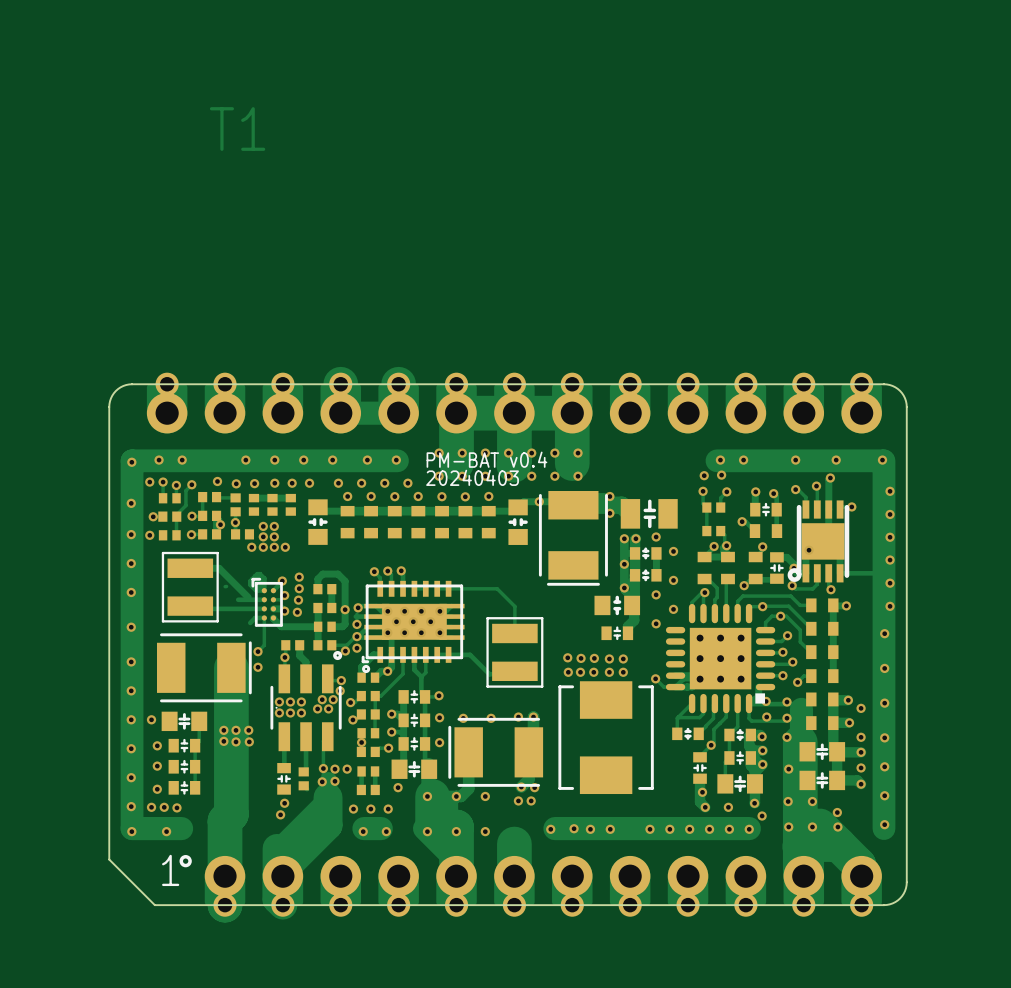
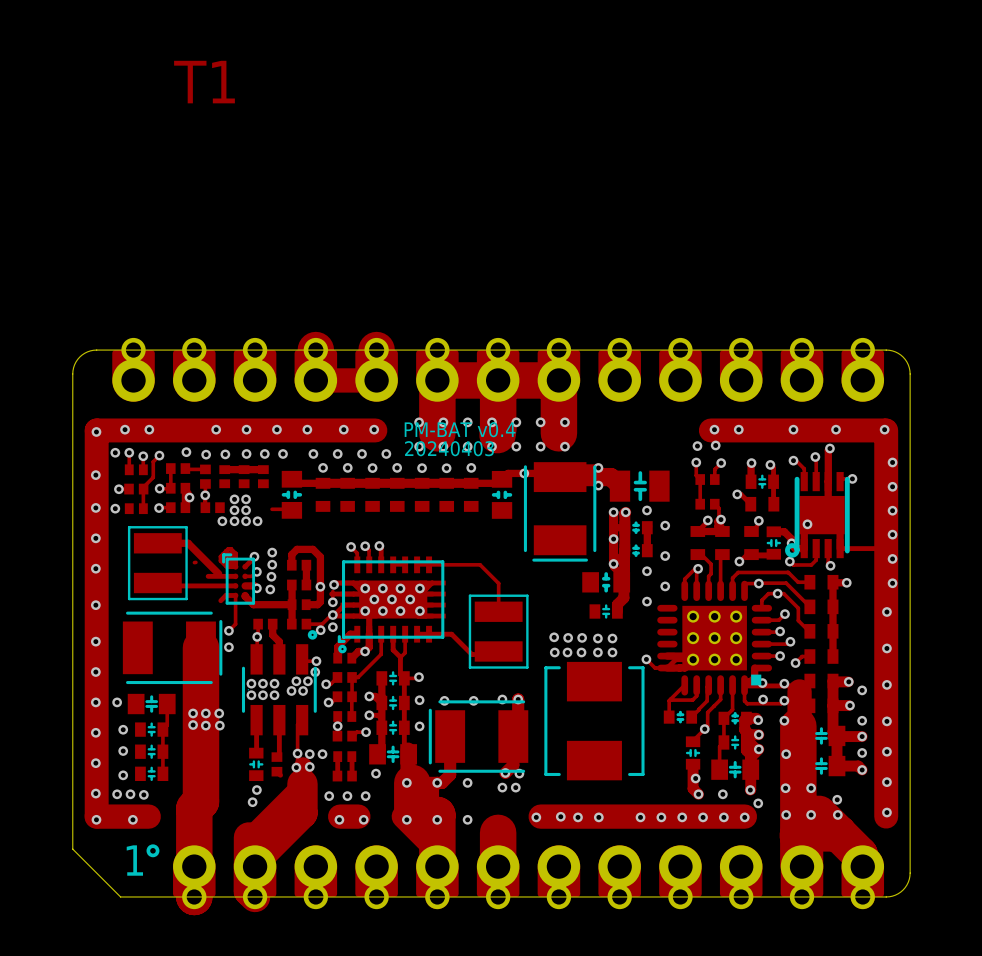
track: none -> (272, 509) (291, 510)

